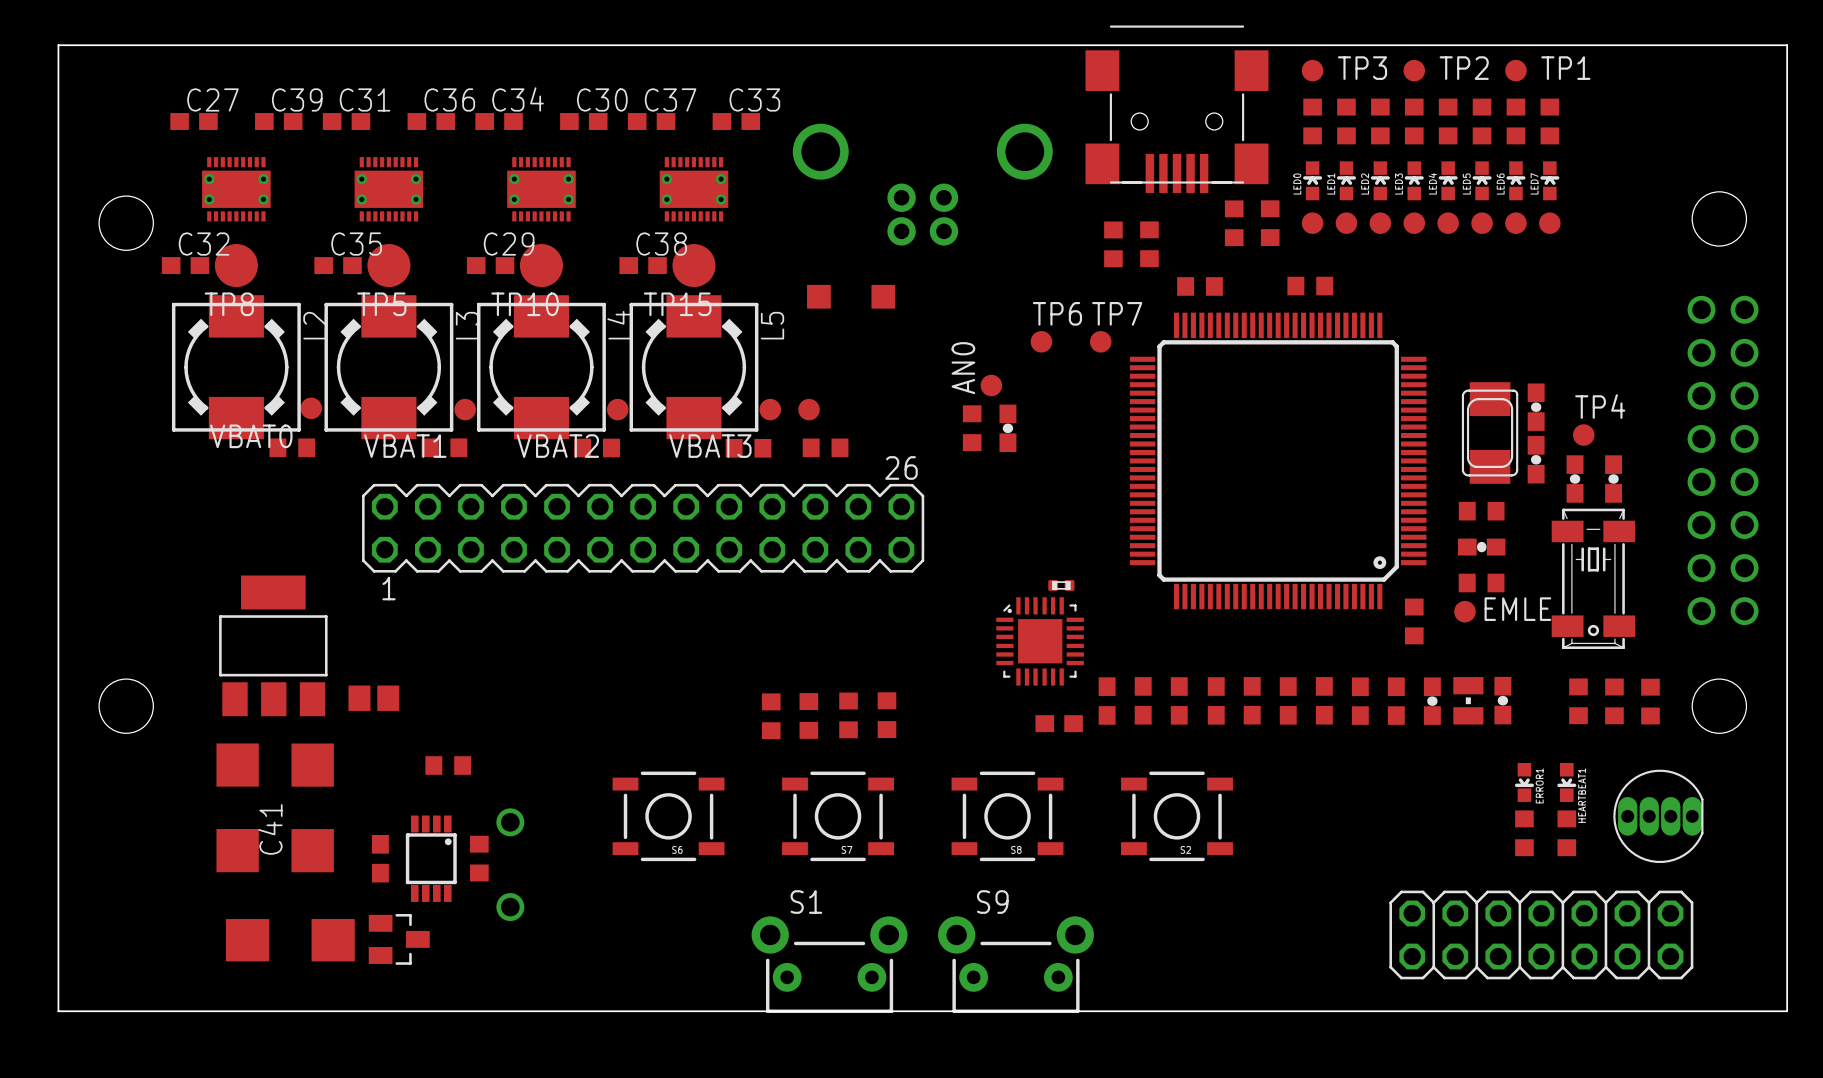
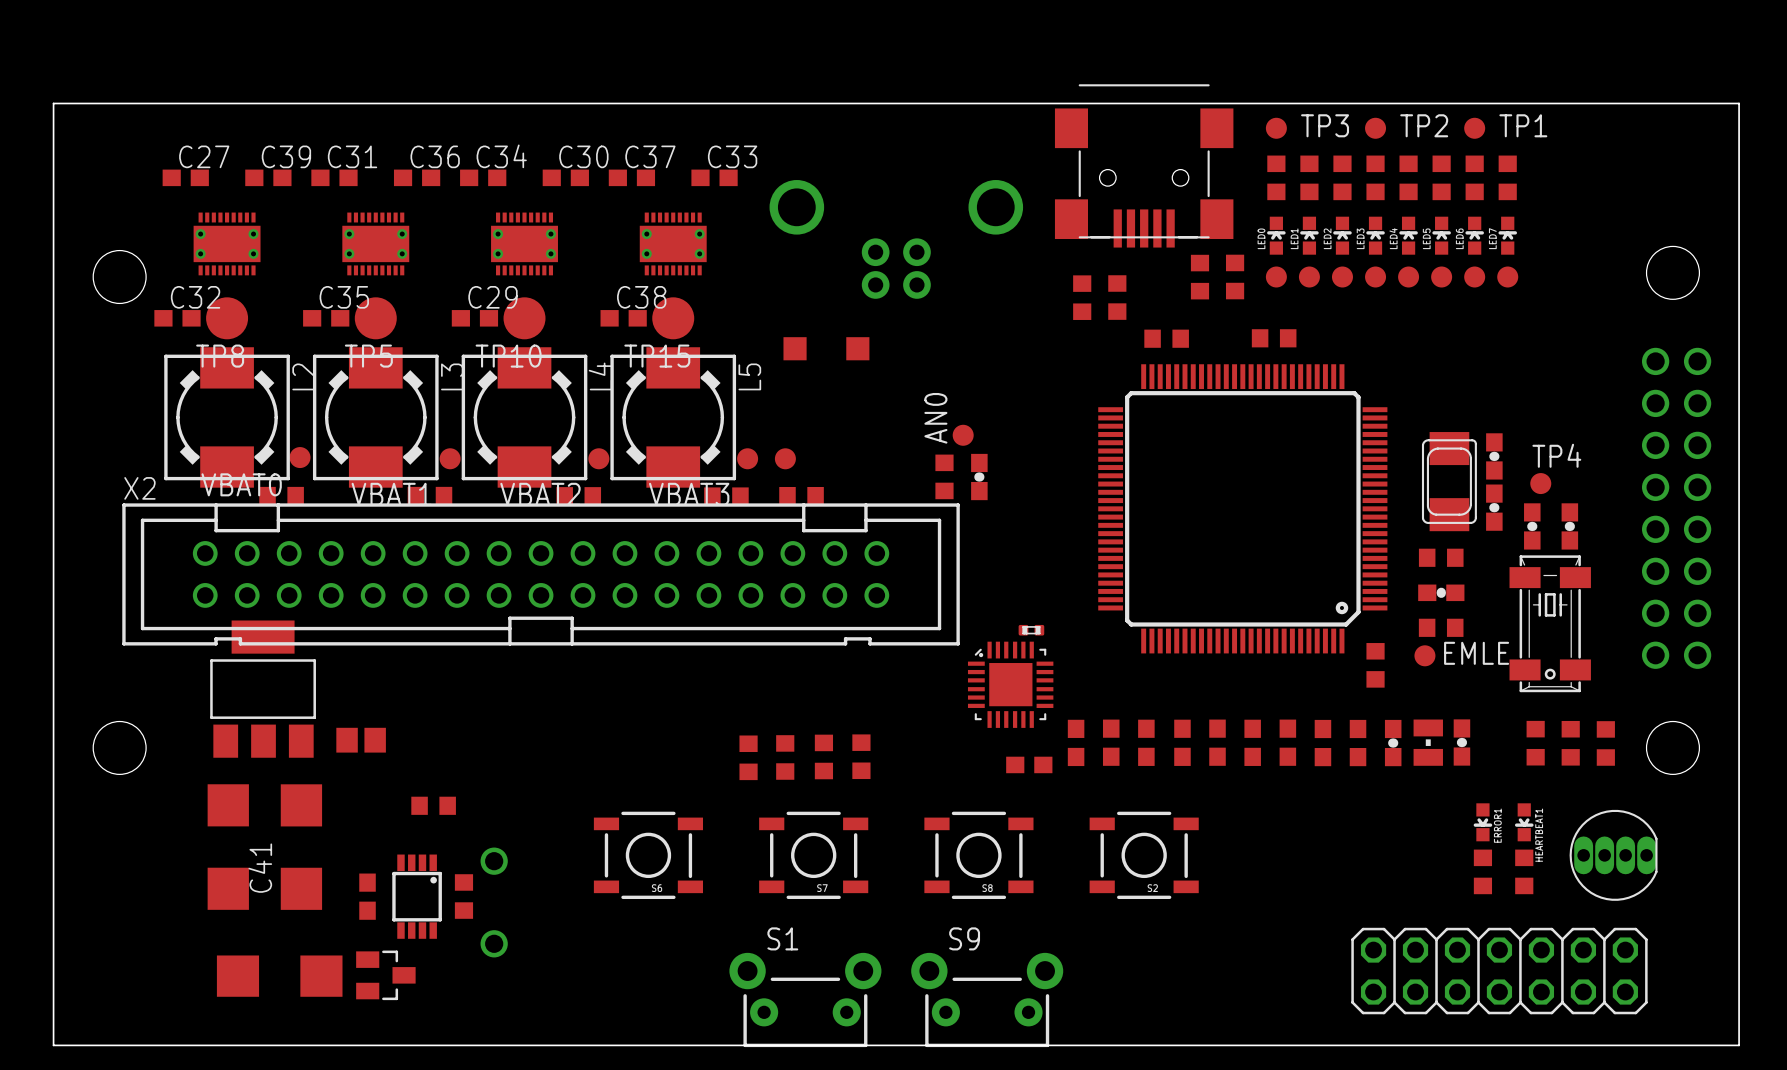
TP6: (1041, 341) -> none
TP7: (1100, 341) -> none
X2: none -> (541, 574)
part: (643, 528) -> none

